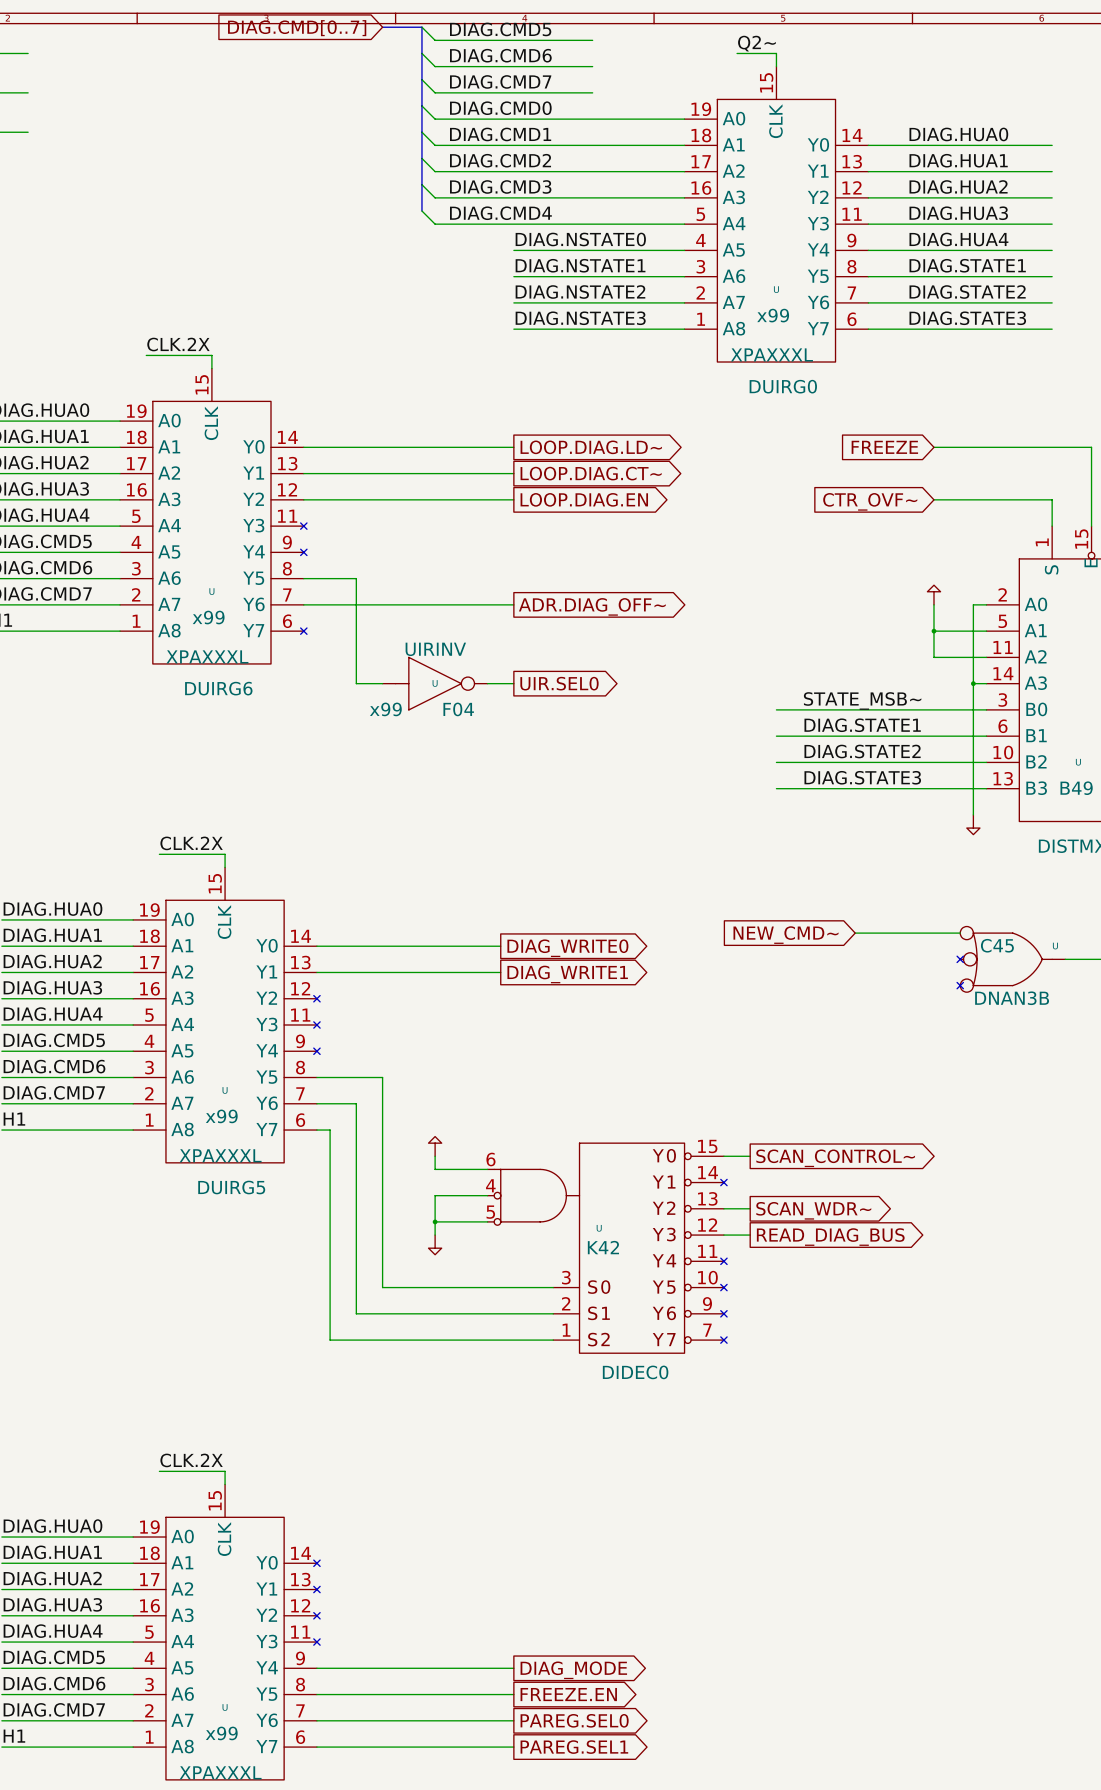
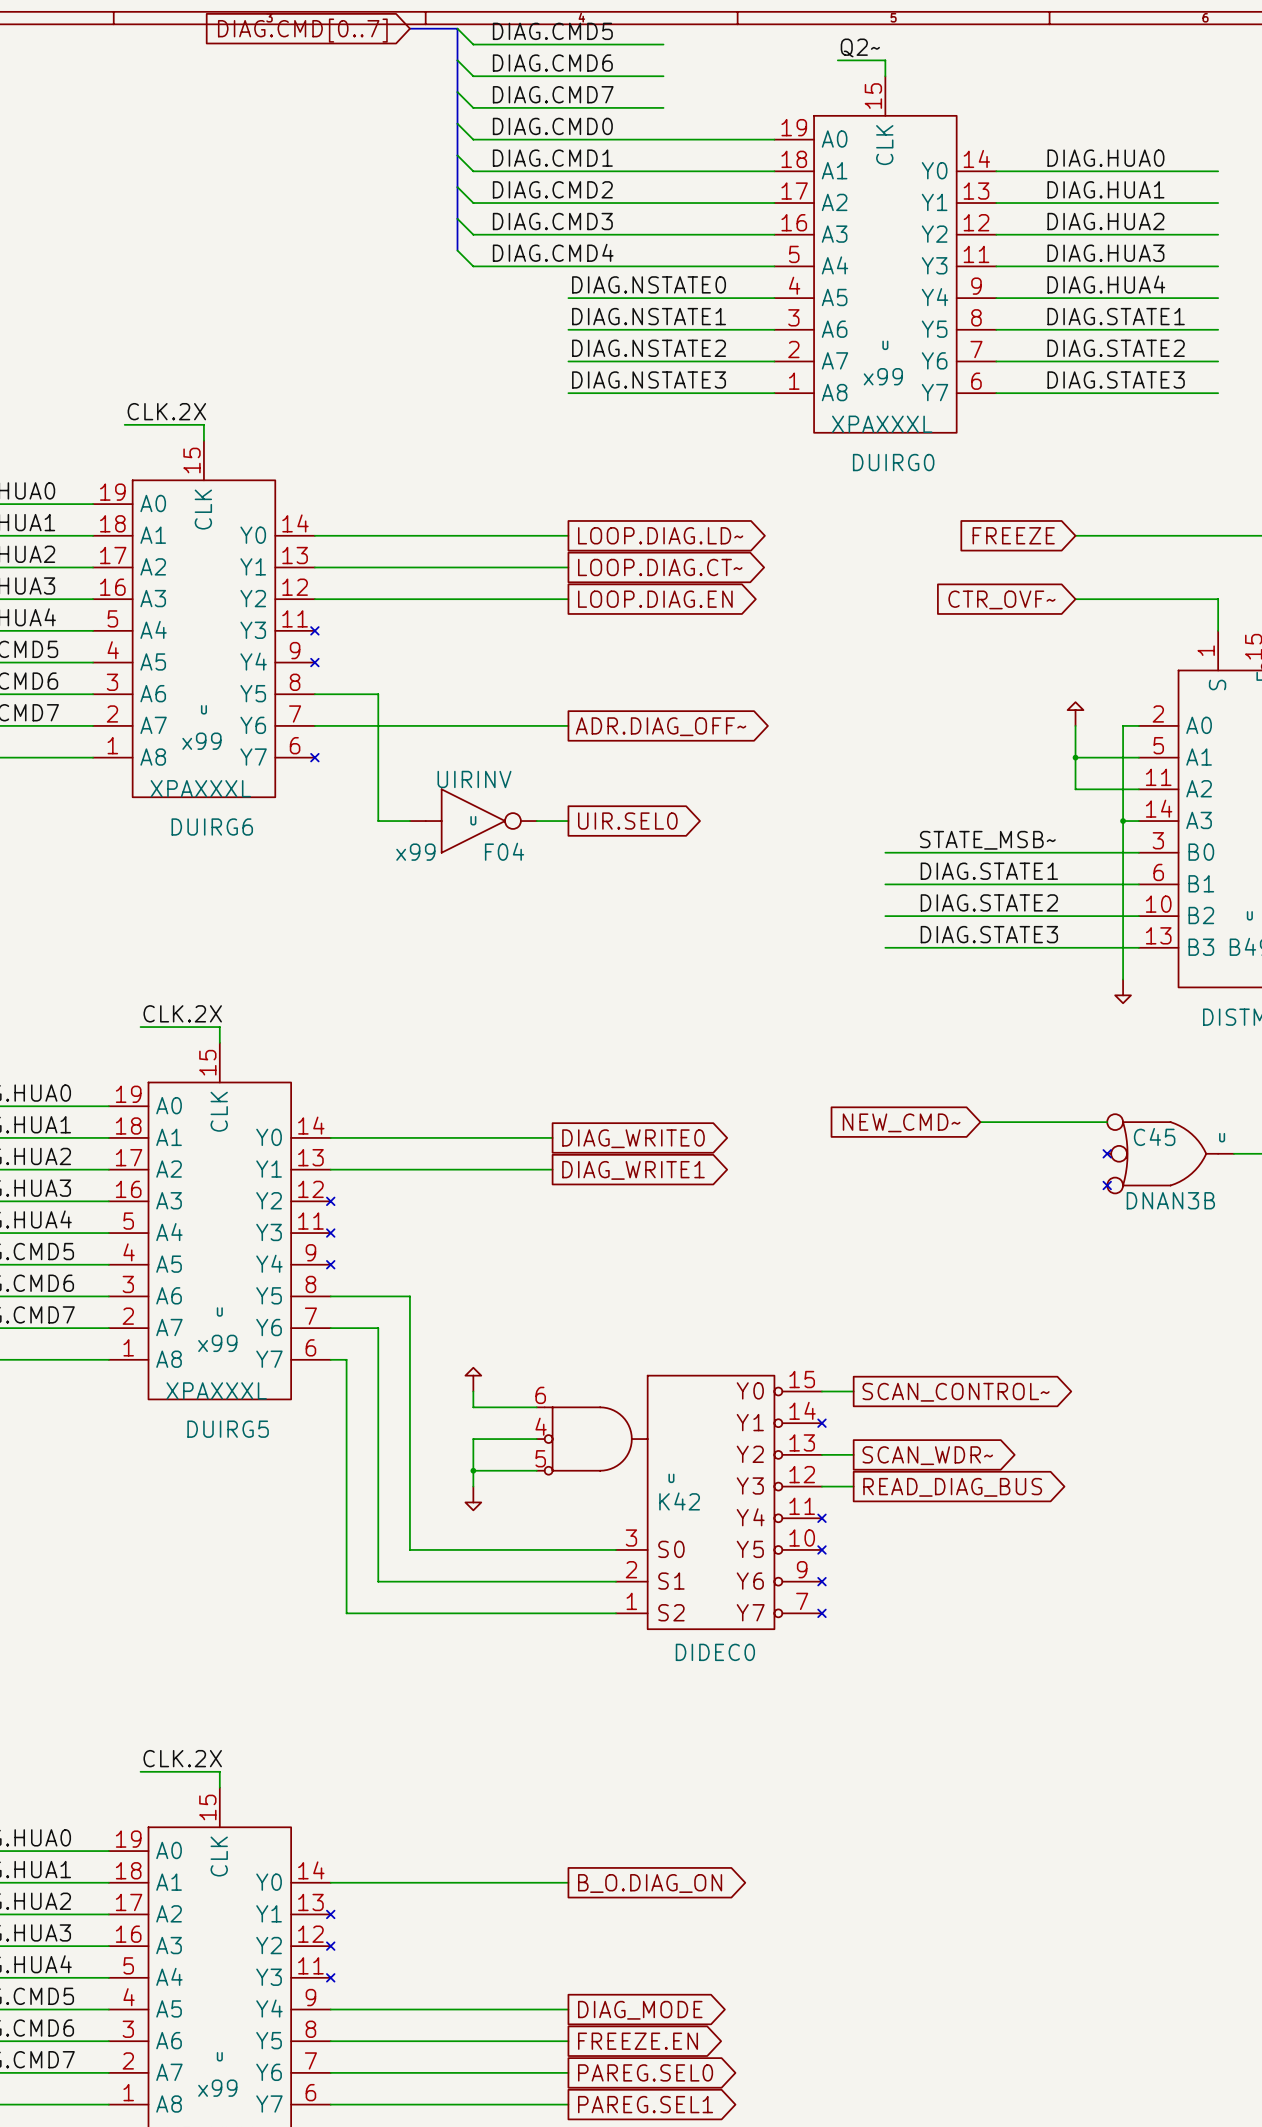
wire: none -> (330, 1882) (568, 1882)
no-connect mark: (316, 1563) -> none
global label: none -> B_O.DIAG_ON (650, 1883)

